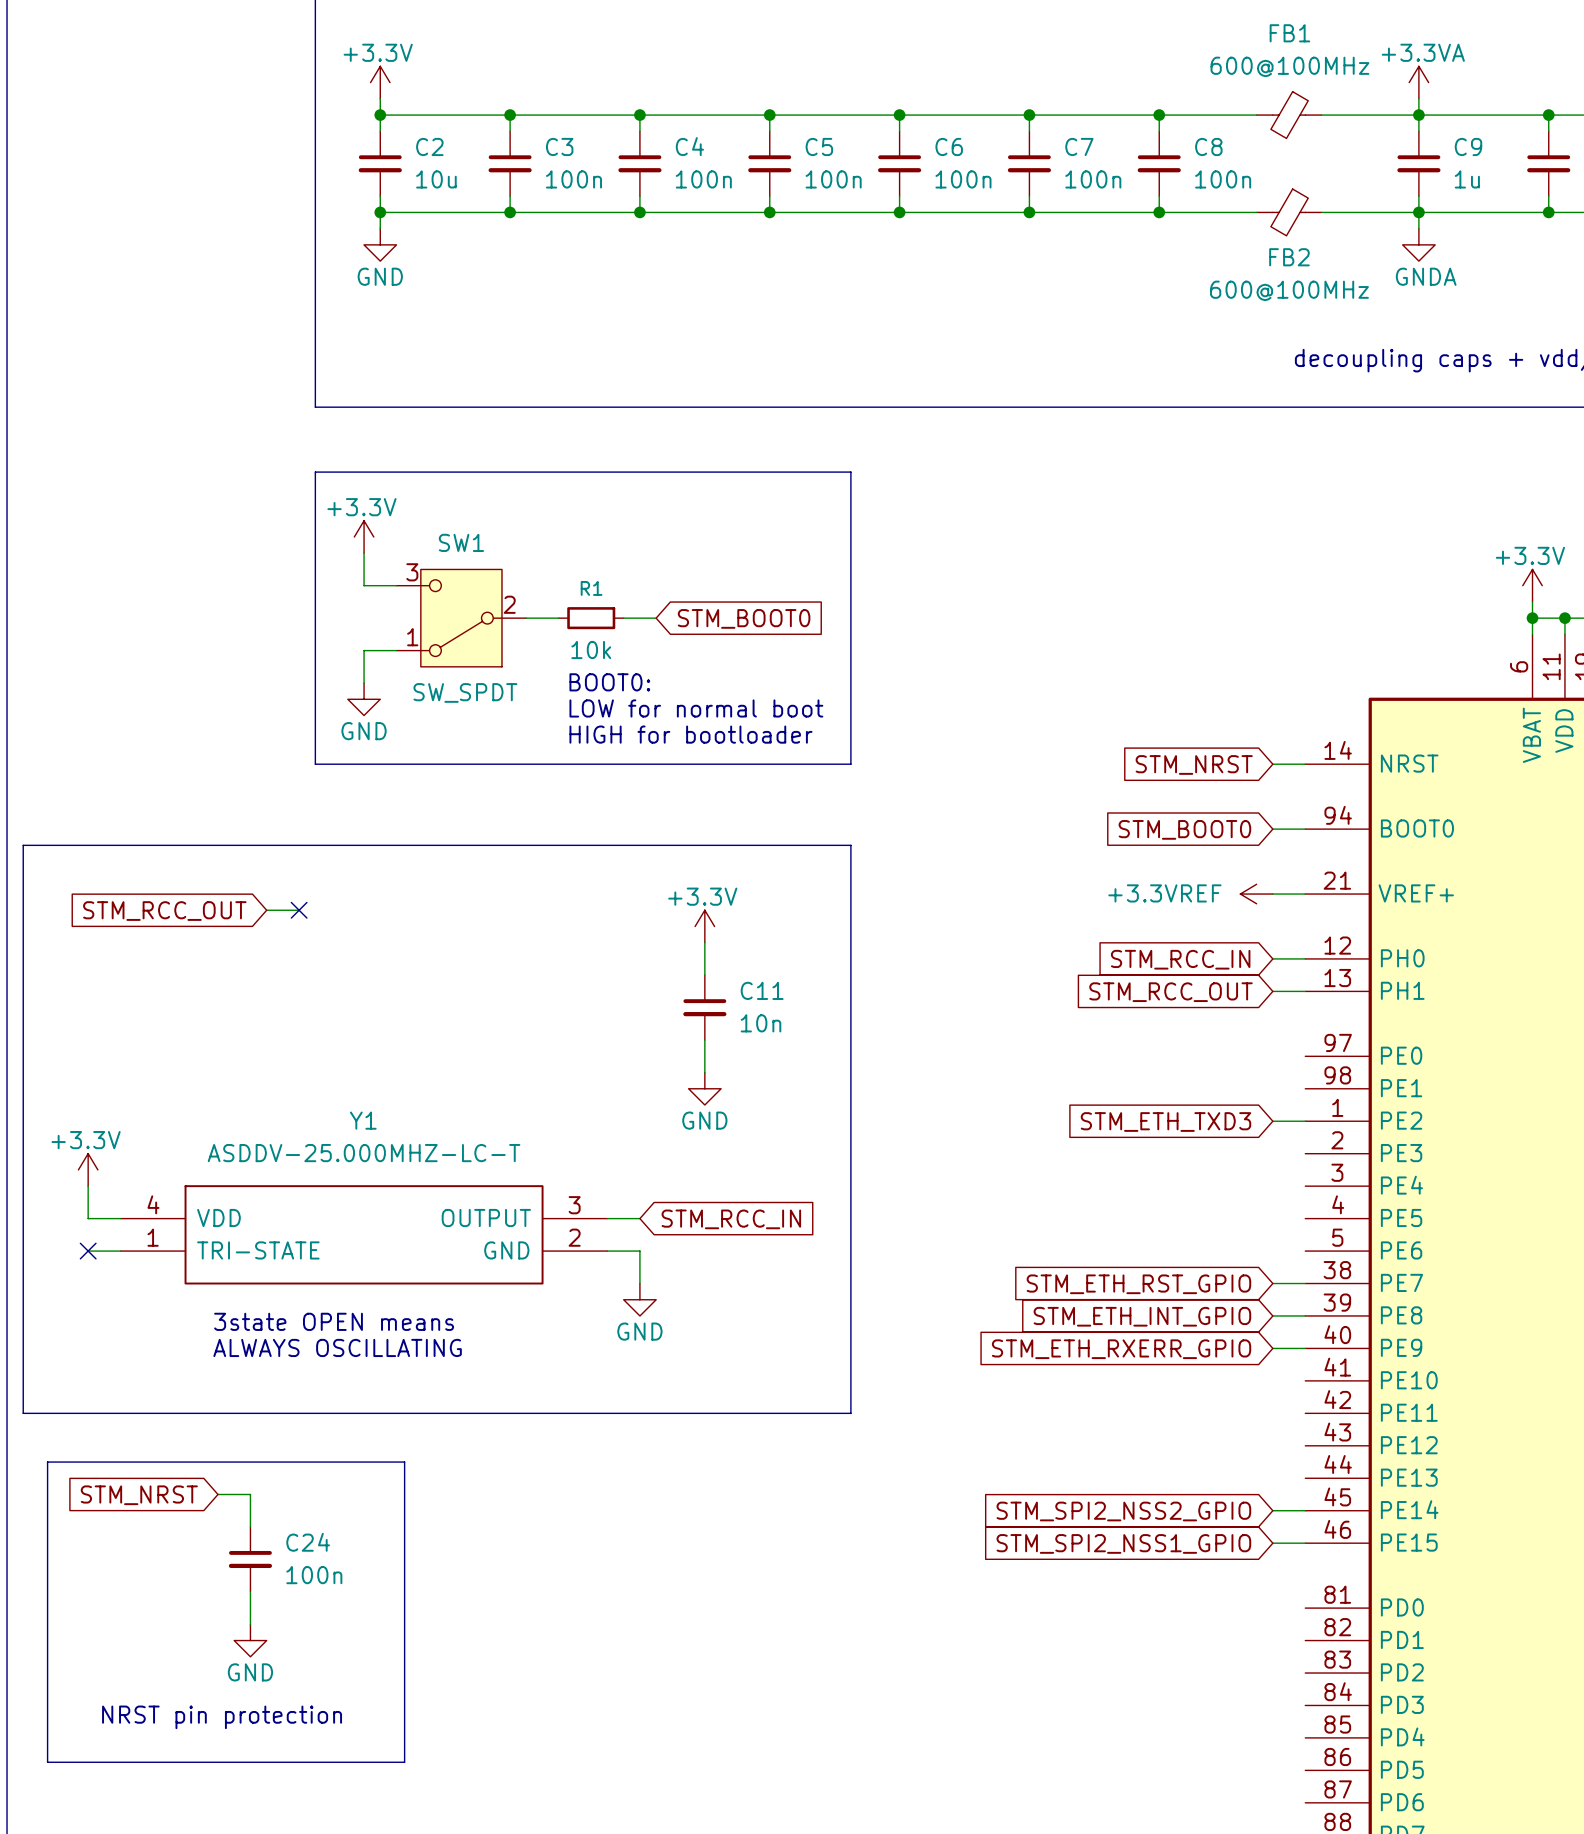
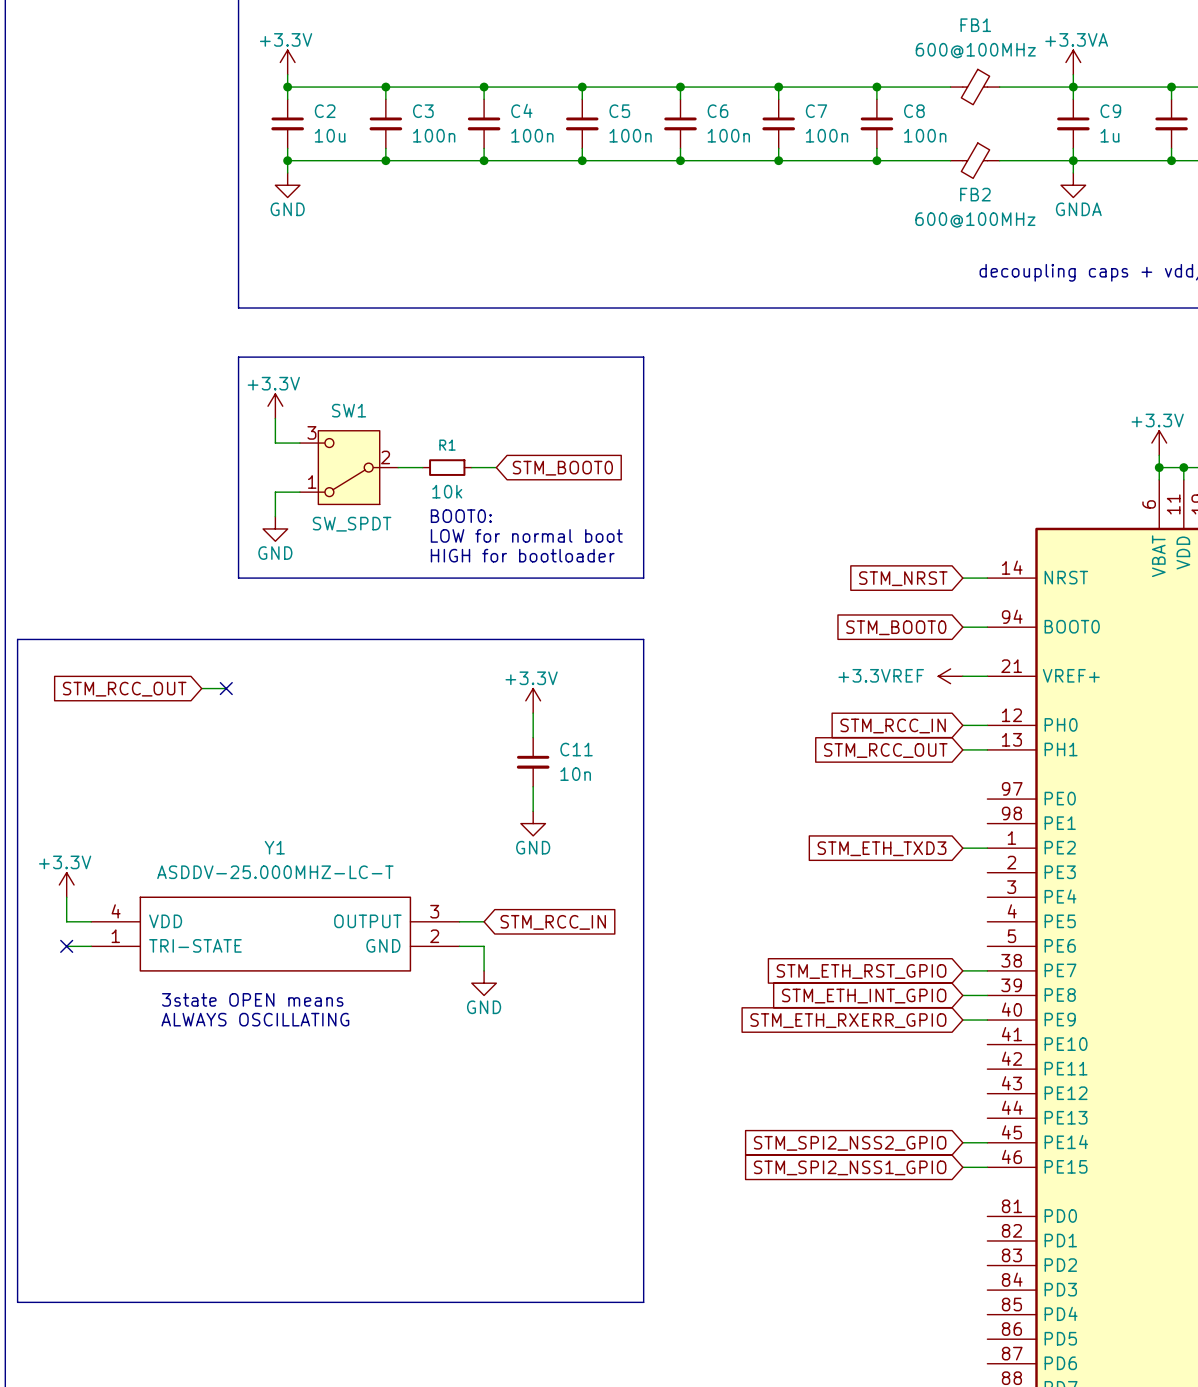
line: (23, 1413) (850, 1413) -> (17, 1069) (17, 1302) (643, 1302) (643, 1069)
line: (47, 1462) (404, 1462) (404, 1762) (47, 1762) (47, 1462) -> none
wire: (217, 1494) (250, 1494) (250, 1526) -> none
global label: STM_NRST (139, 1495) -> none
C24: 100n (250, 1559) -> none
wire: (250, 1591) (250, 1624) -> none
power symbol: GND (250, 1640) -> none
text: NRST pin protection (222, 1717) -> none

